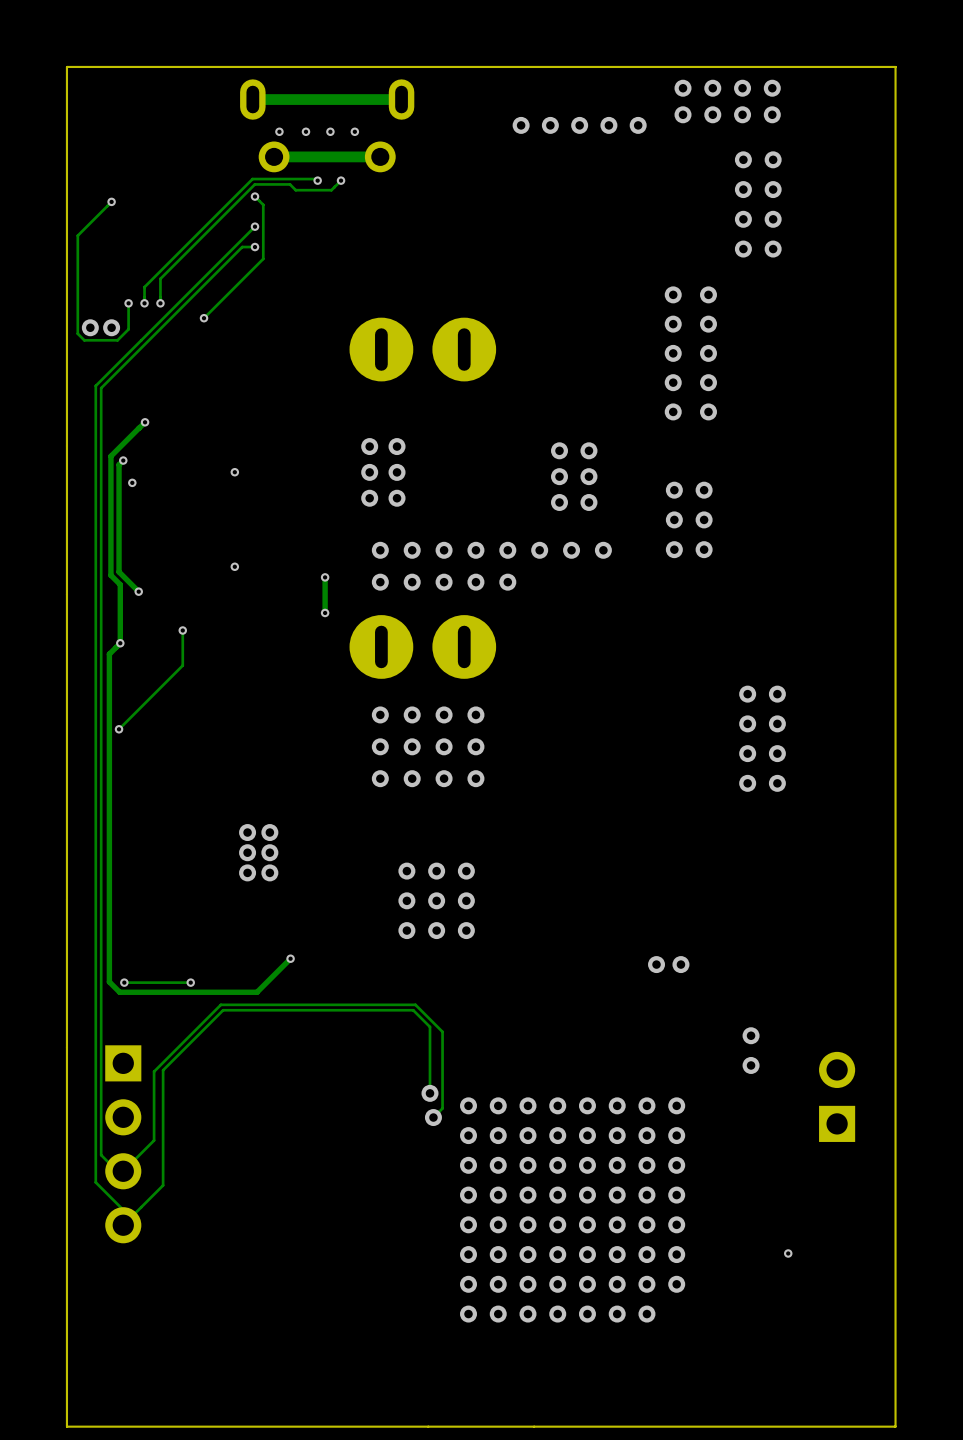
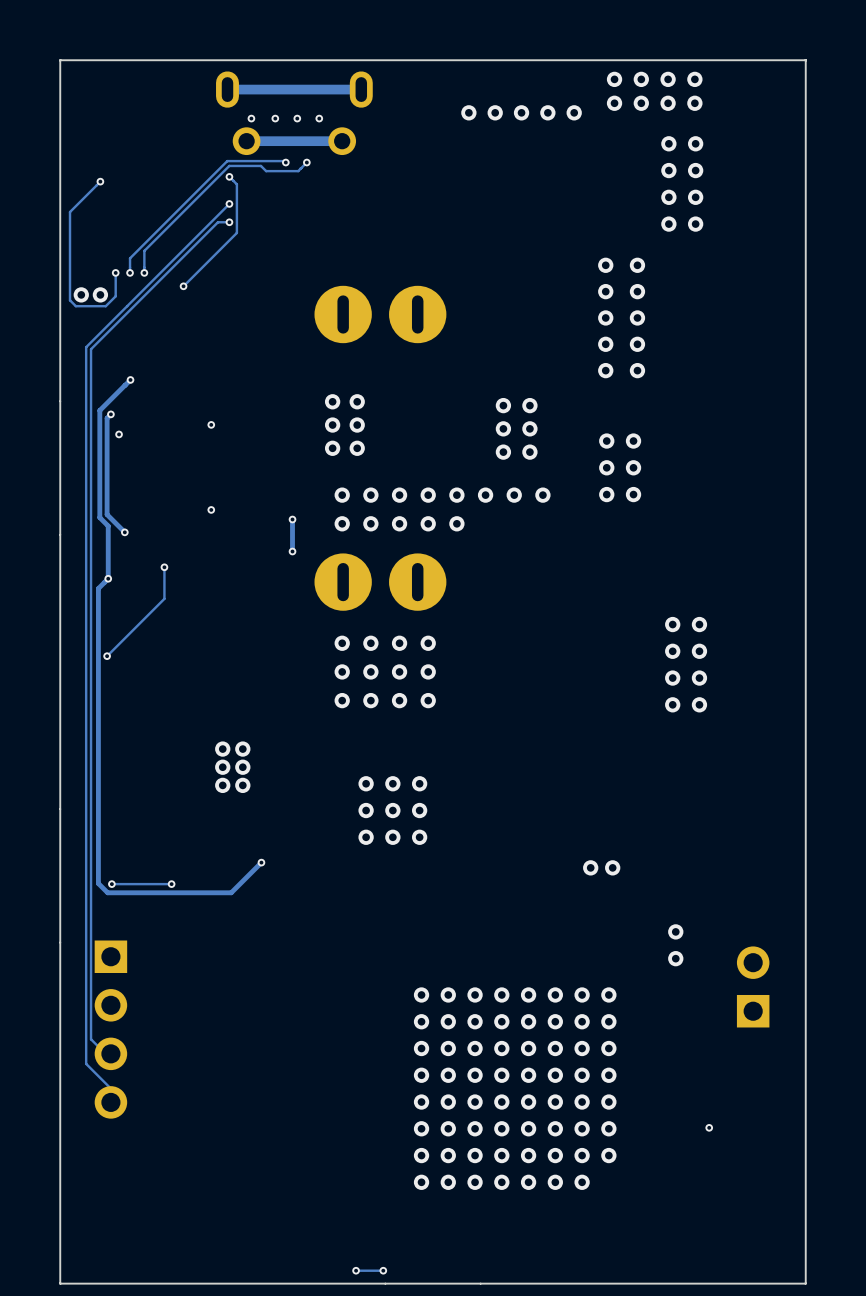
track: (430, 1093) (430, 1026) (413, 1010) (223, 1010) (163, 1070) (163, 1185) (123, 1225) -> none
via: (430, 1093) -> none
track: (433, 1117) (442, 1108) (442, 1031) (415, 1004) (220, 1004) (154, 1071) (154, 1140) (123, 1171) -> none
via: (433, 1117) -> none
via: none -> (356, 1270)
track: none -> (383, 1270) (356, 1270)
via: none -> (383, 1270)

